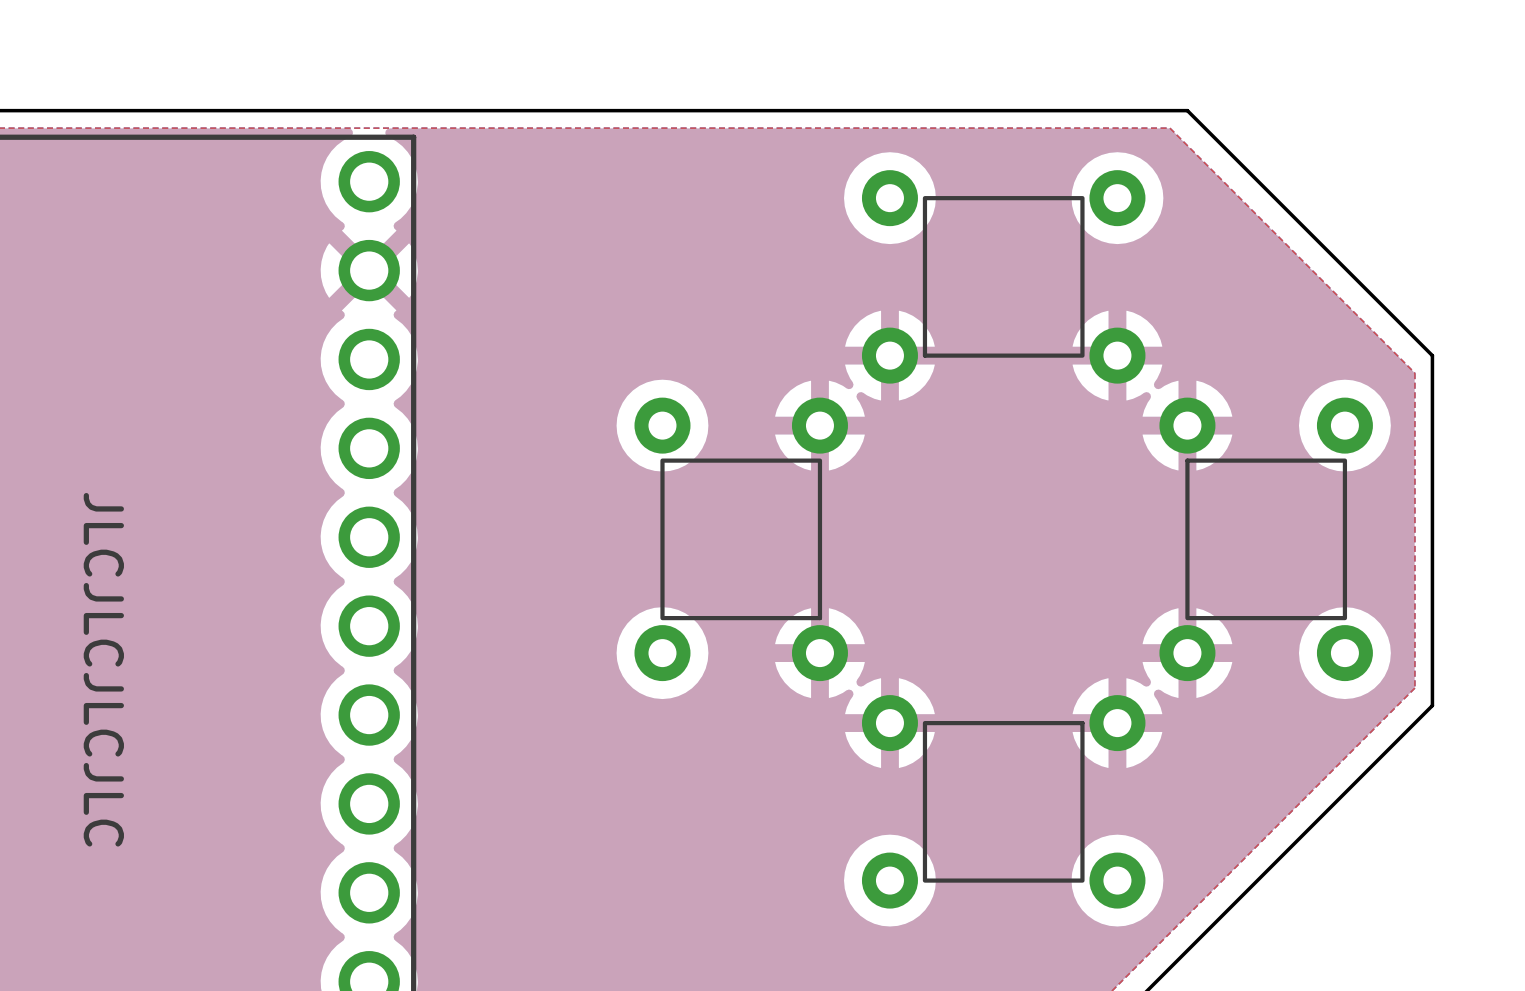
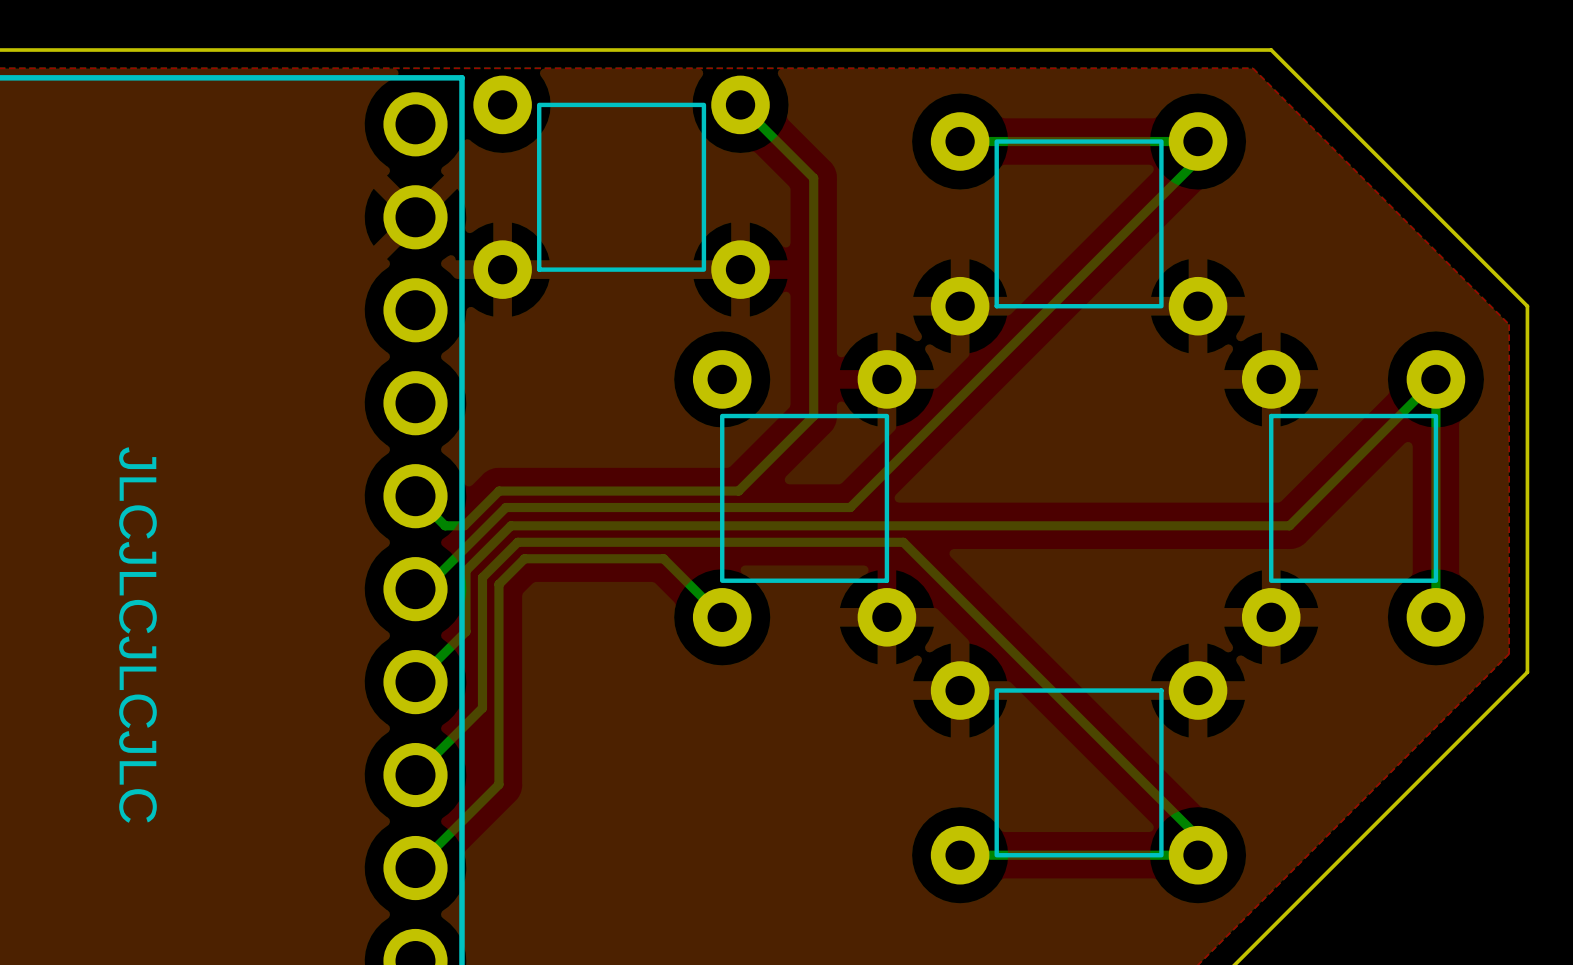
bottom track: none -> (740, 104) (813, 178) (813, 416) (738, 491) (499, 491) (464, 525) (445, 525) (415, 496)
bottom track: none -> (960, 141) (1198, 141) (1198, 159) (850, 507) (505, 507) (424, 589) (415, 589)
part: none -> (621, 187)
bottom track: none -> (722, 617) (663, 558) (524, 558) (498, 584) (498, 784) (415, 868)
bottom track: none -> (1435, 617) (1435, 379) (1289, 525) (510, 525) (466, 570) (466, 631) (415, 682)
bottom track: none -> (415, 775) (482, 708) (482, 577) (517, 542) (903, 542) (1198, 836) (1198, 855) (960, 855)

